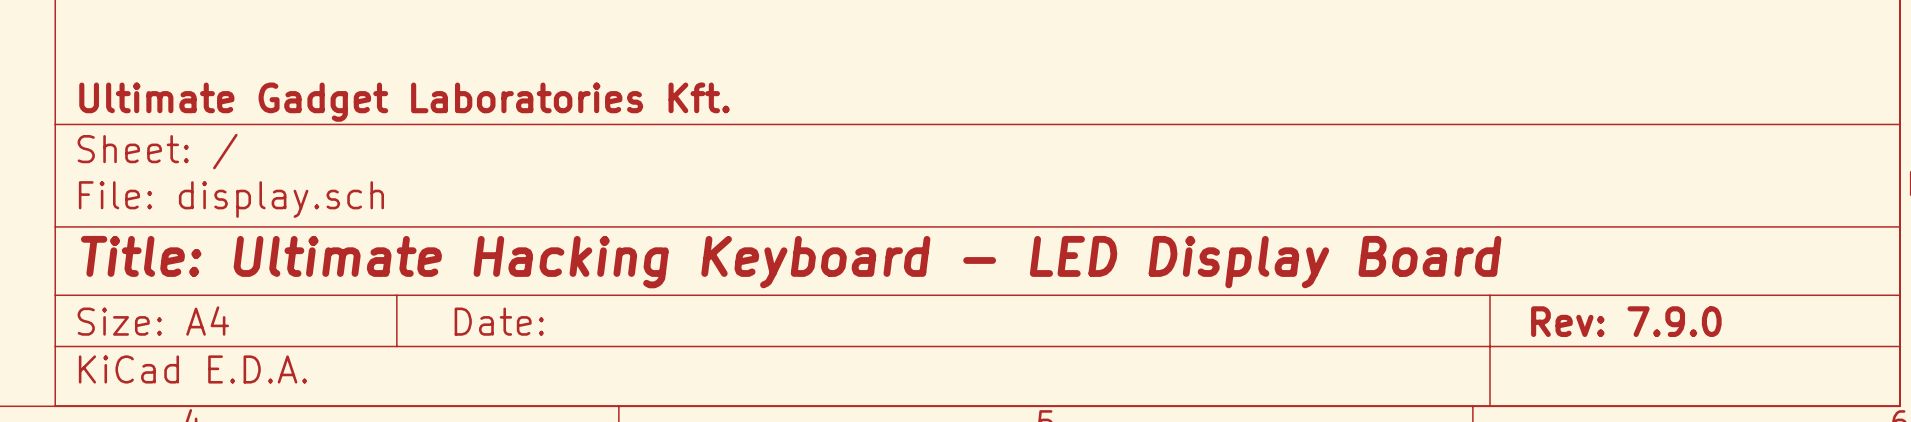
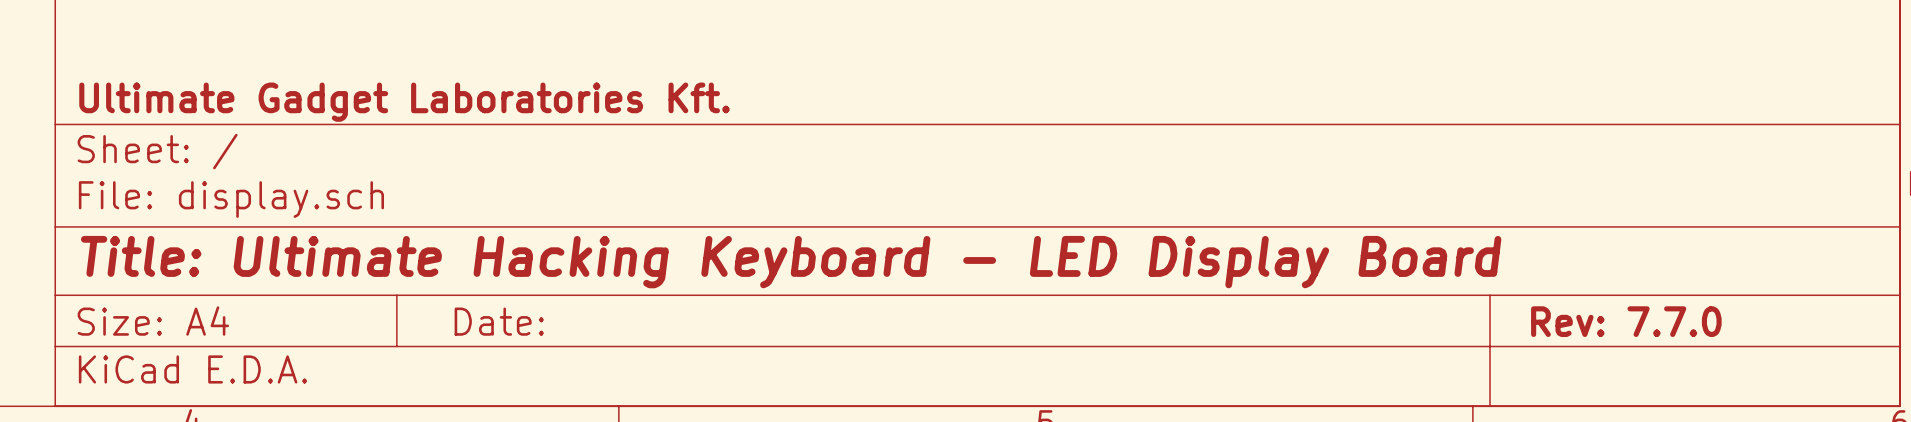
title block: Rev: 7.9.0 (1626, 321) -> Rev: 7.7.0 (1626, 321)

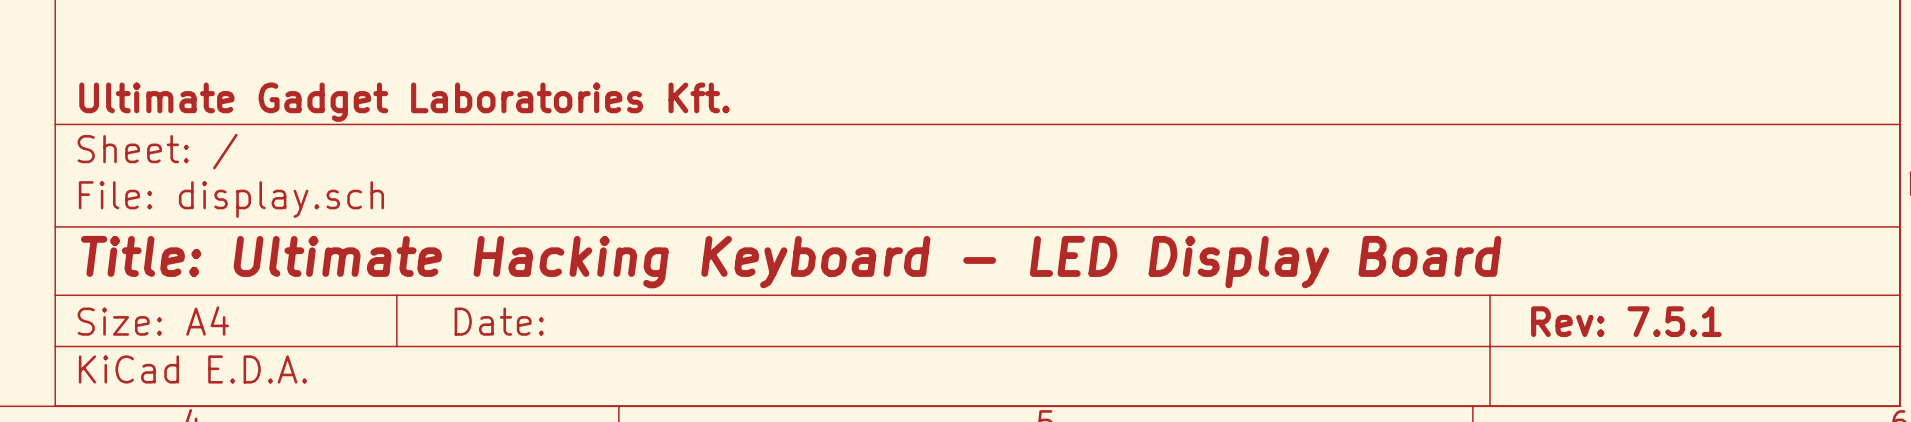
title block: Rev: 7.7.0 (1626, 321) -> Rev: 7.5.1 (1626, 321)

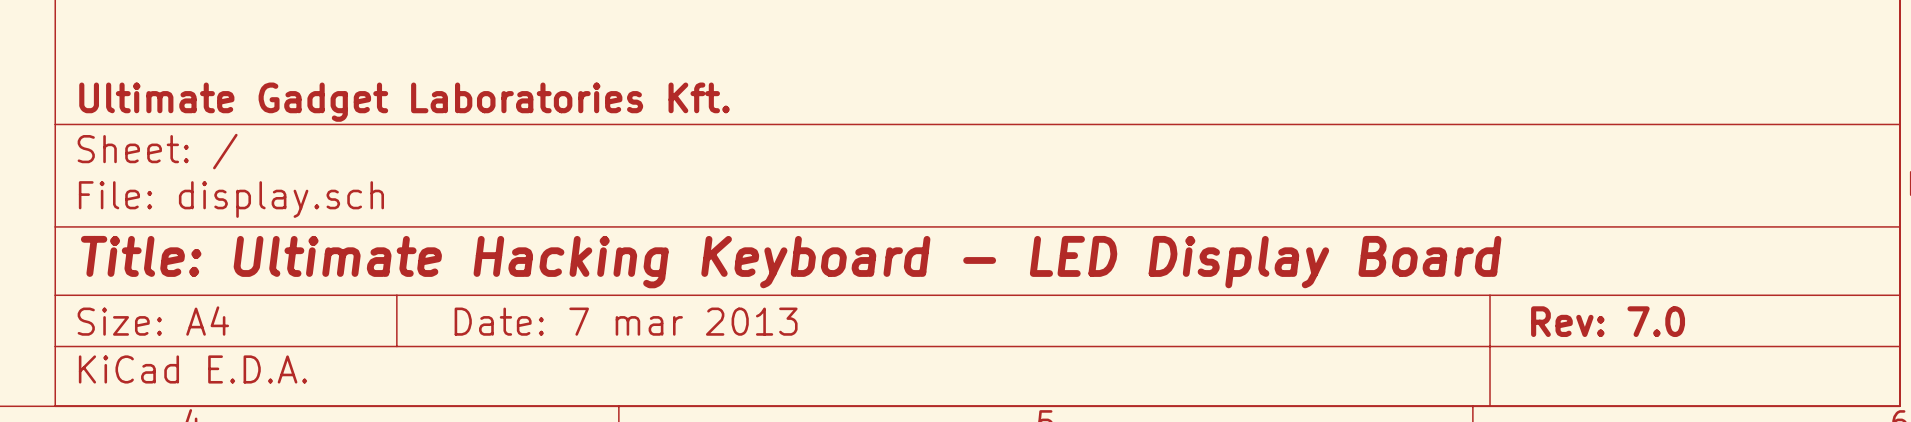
title block: Date: (499, 321) -> Date: 7 mar 2013 (626, 321)
title block: Rev: 7.5.1 (1626, 321) -> Rev: 7.0 (1608, 321)

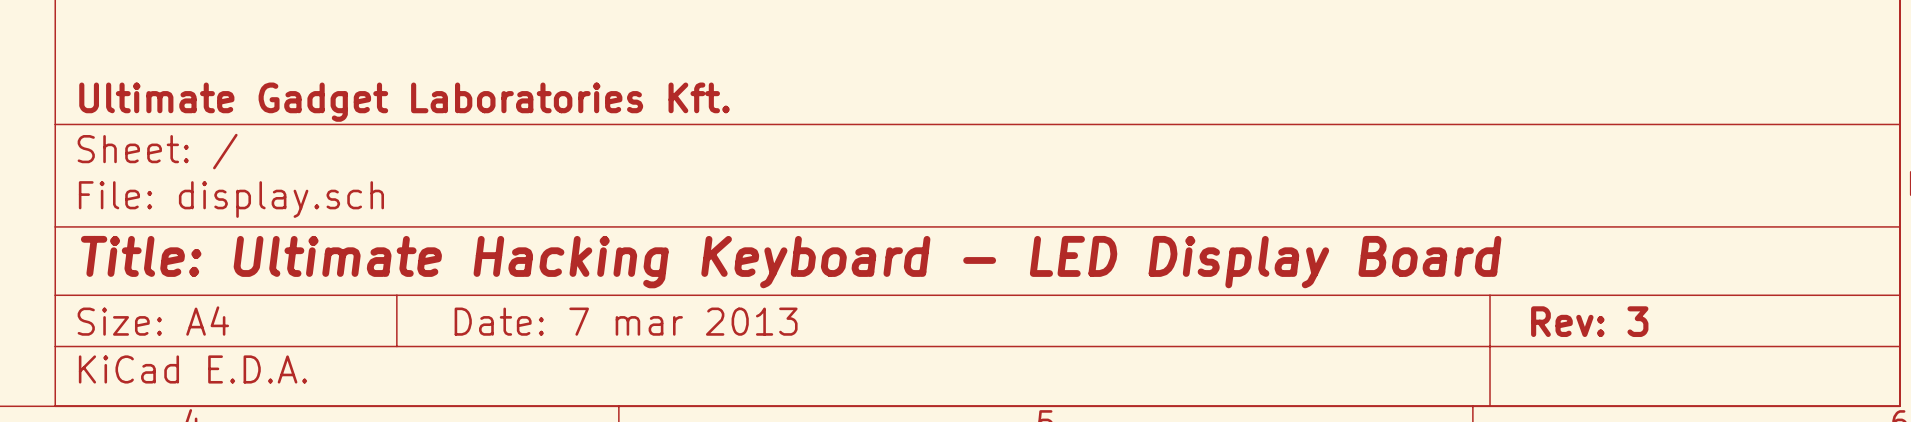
title block: Rev: 7.0 (1608, 321) -> Rev: 3 (1589, 321)

